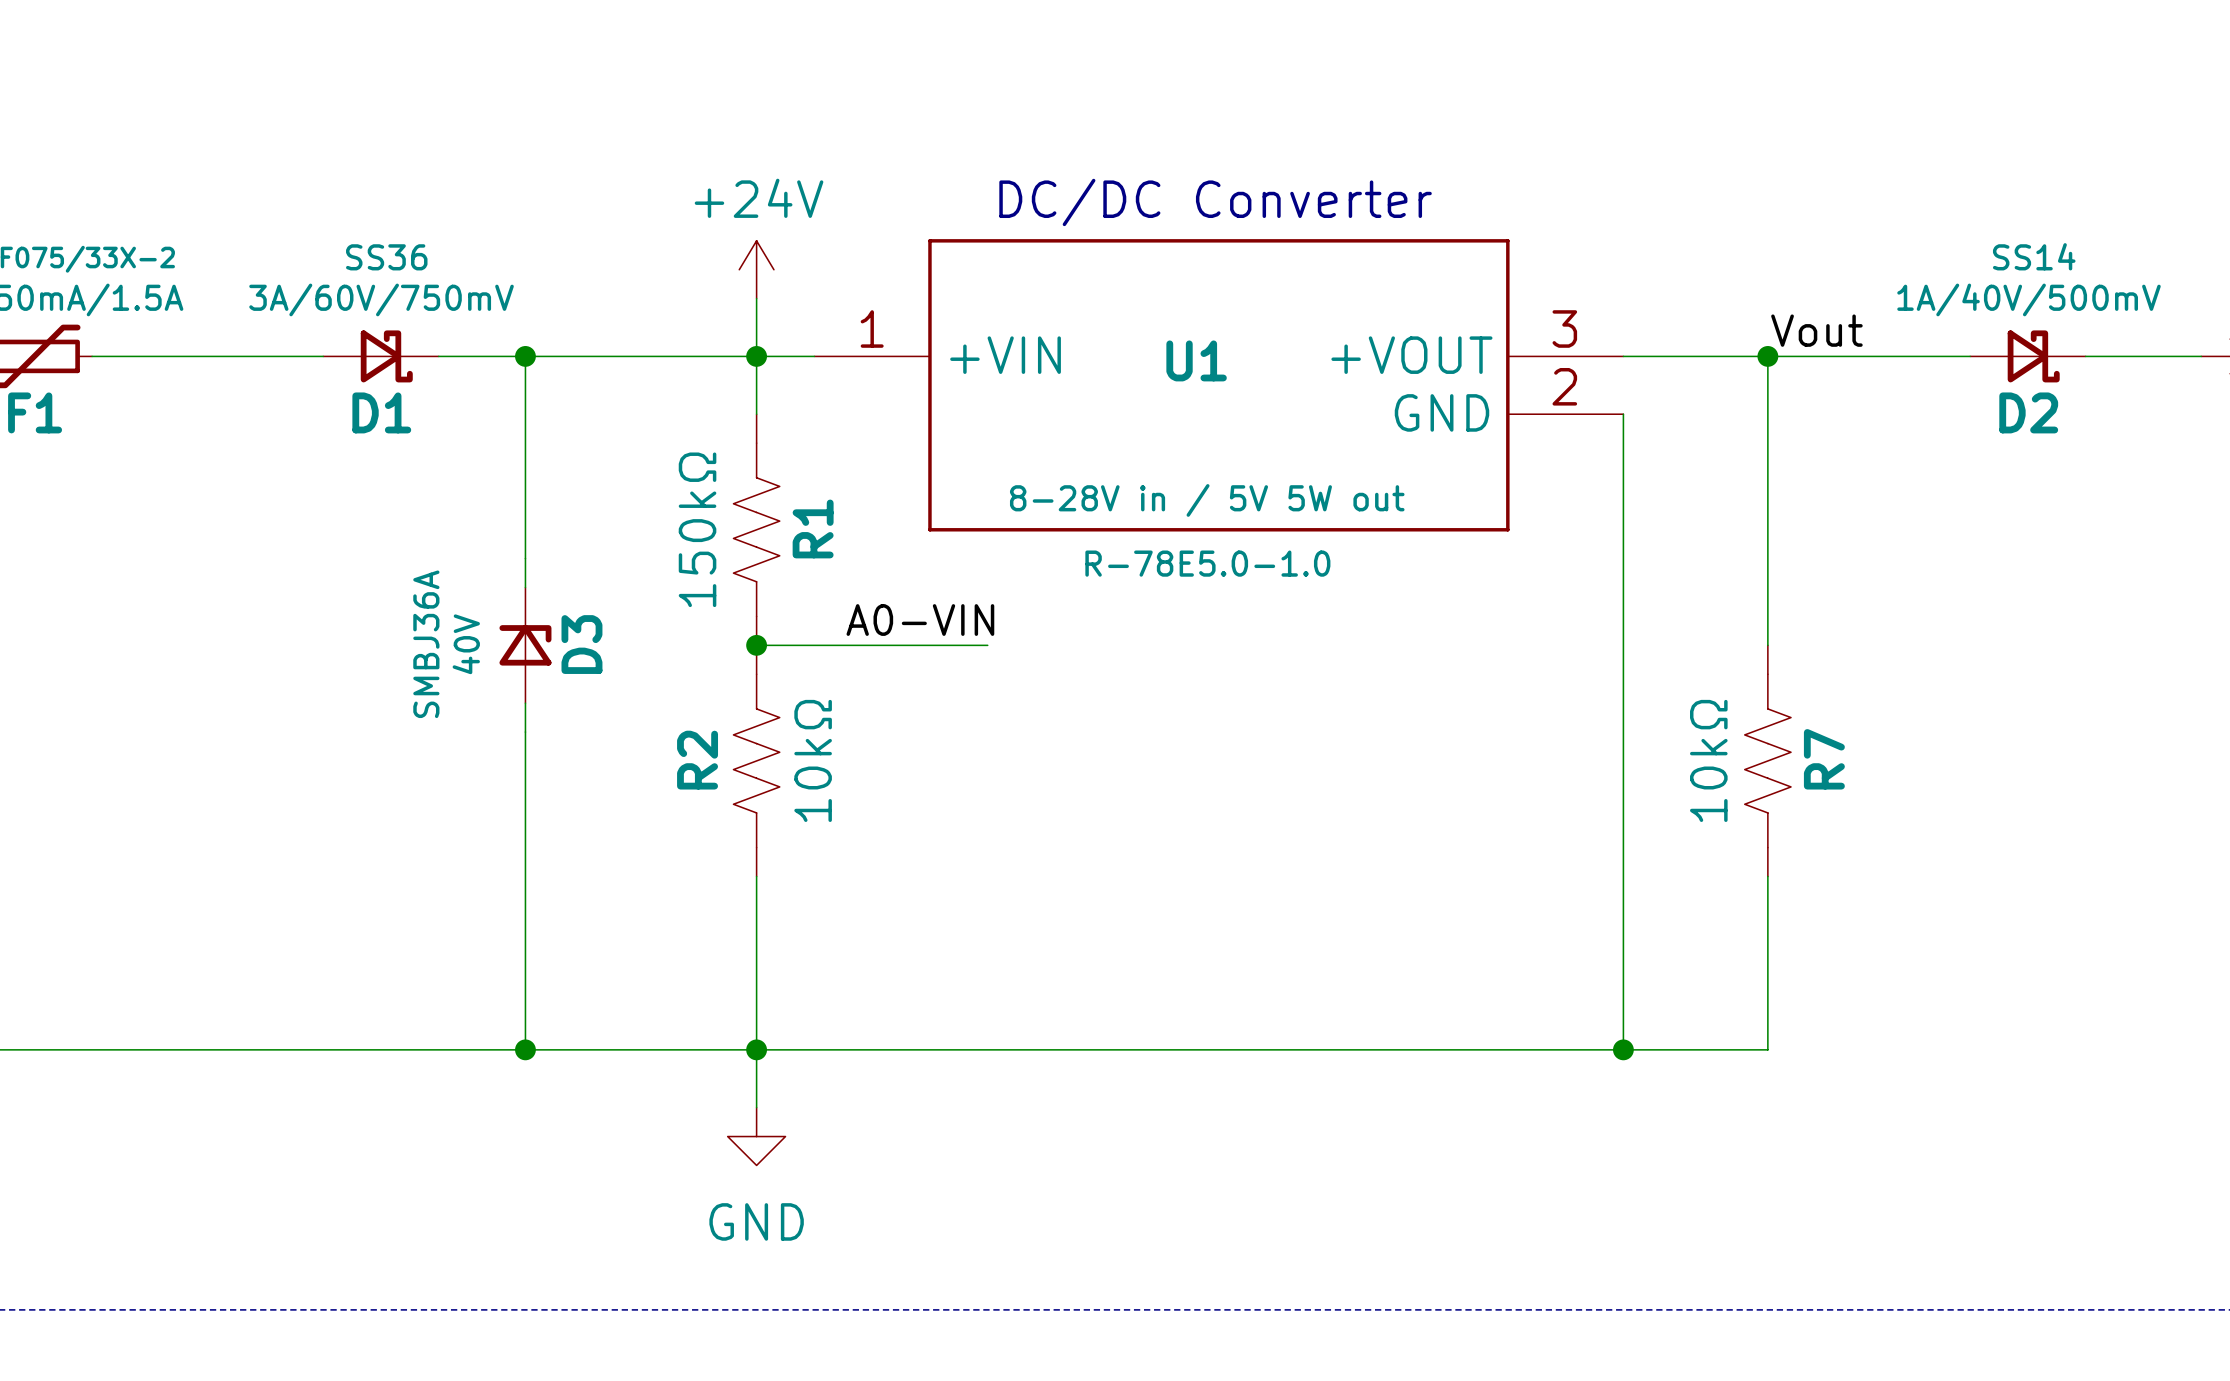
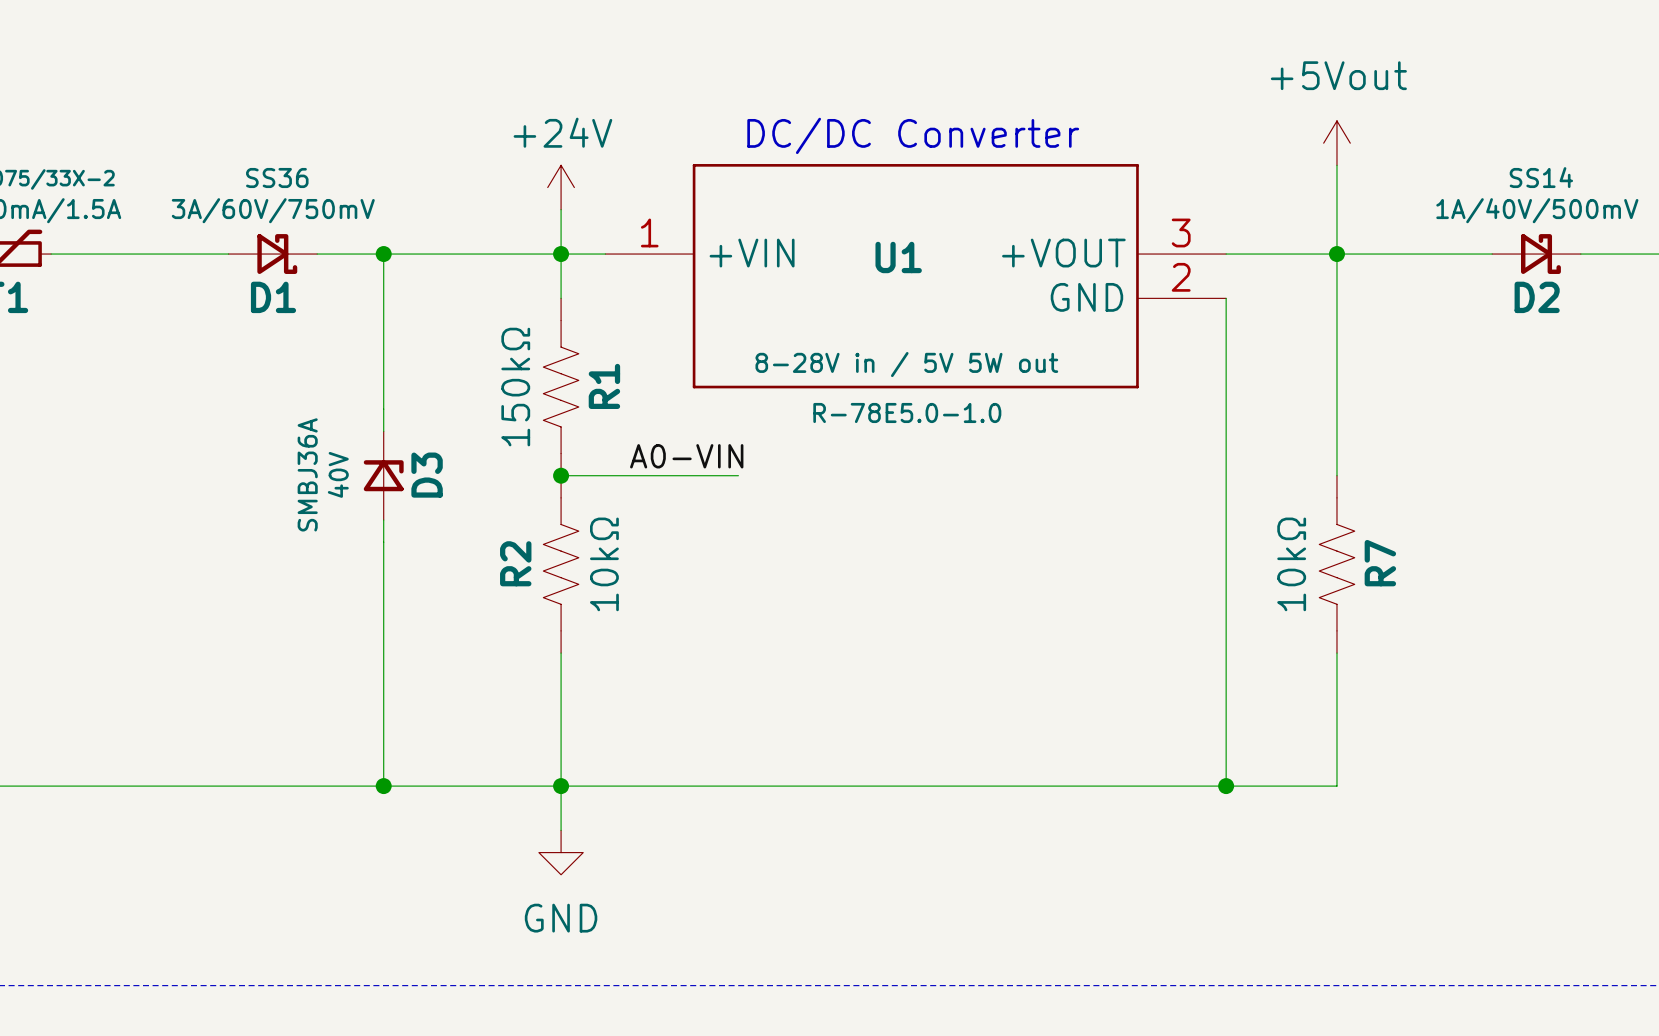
power symbol: none -> +5Vout (1336, 143)
wire: none -> (1336, 165) (1336, 254)
label: Vout (1816, 330) -> none

